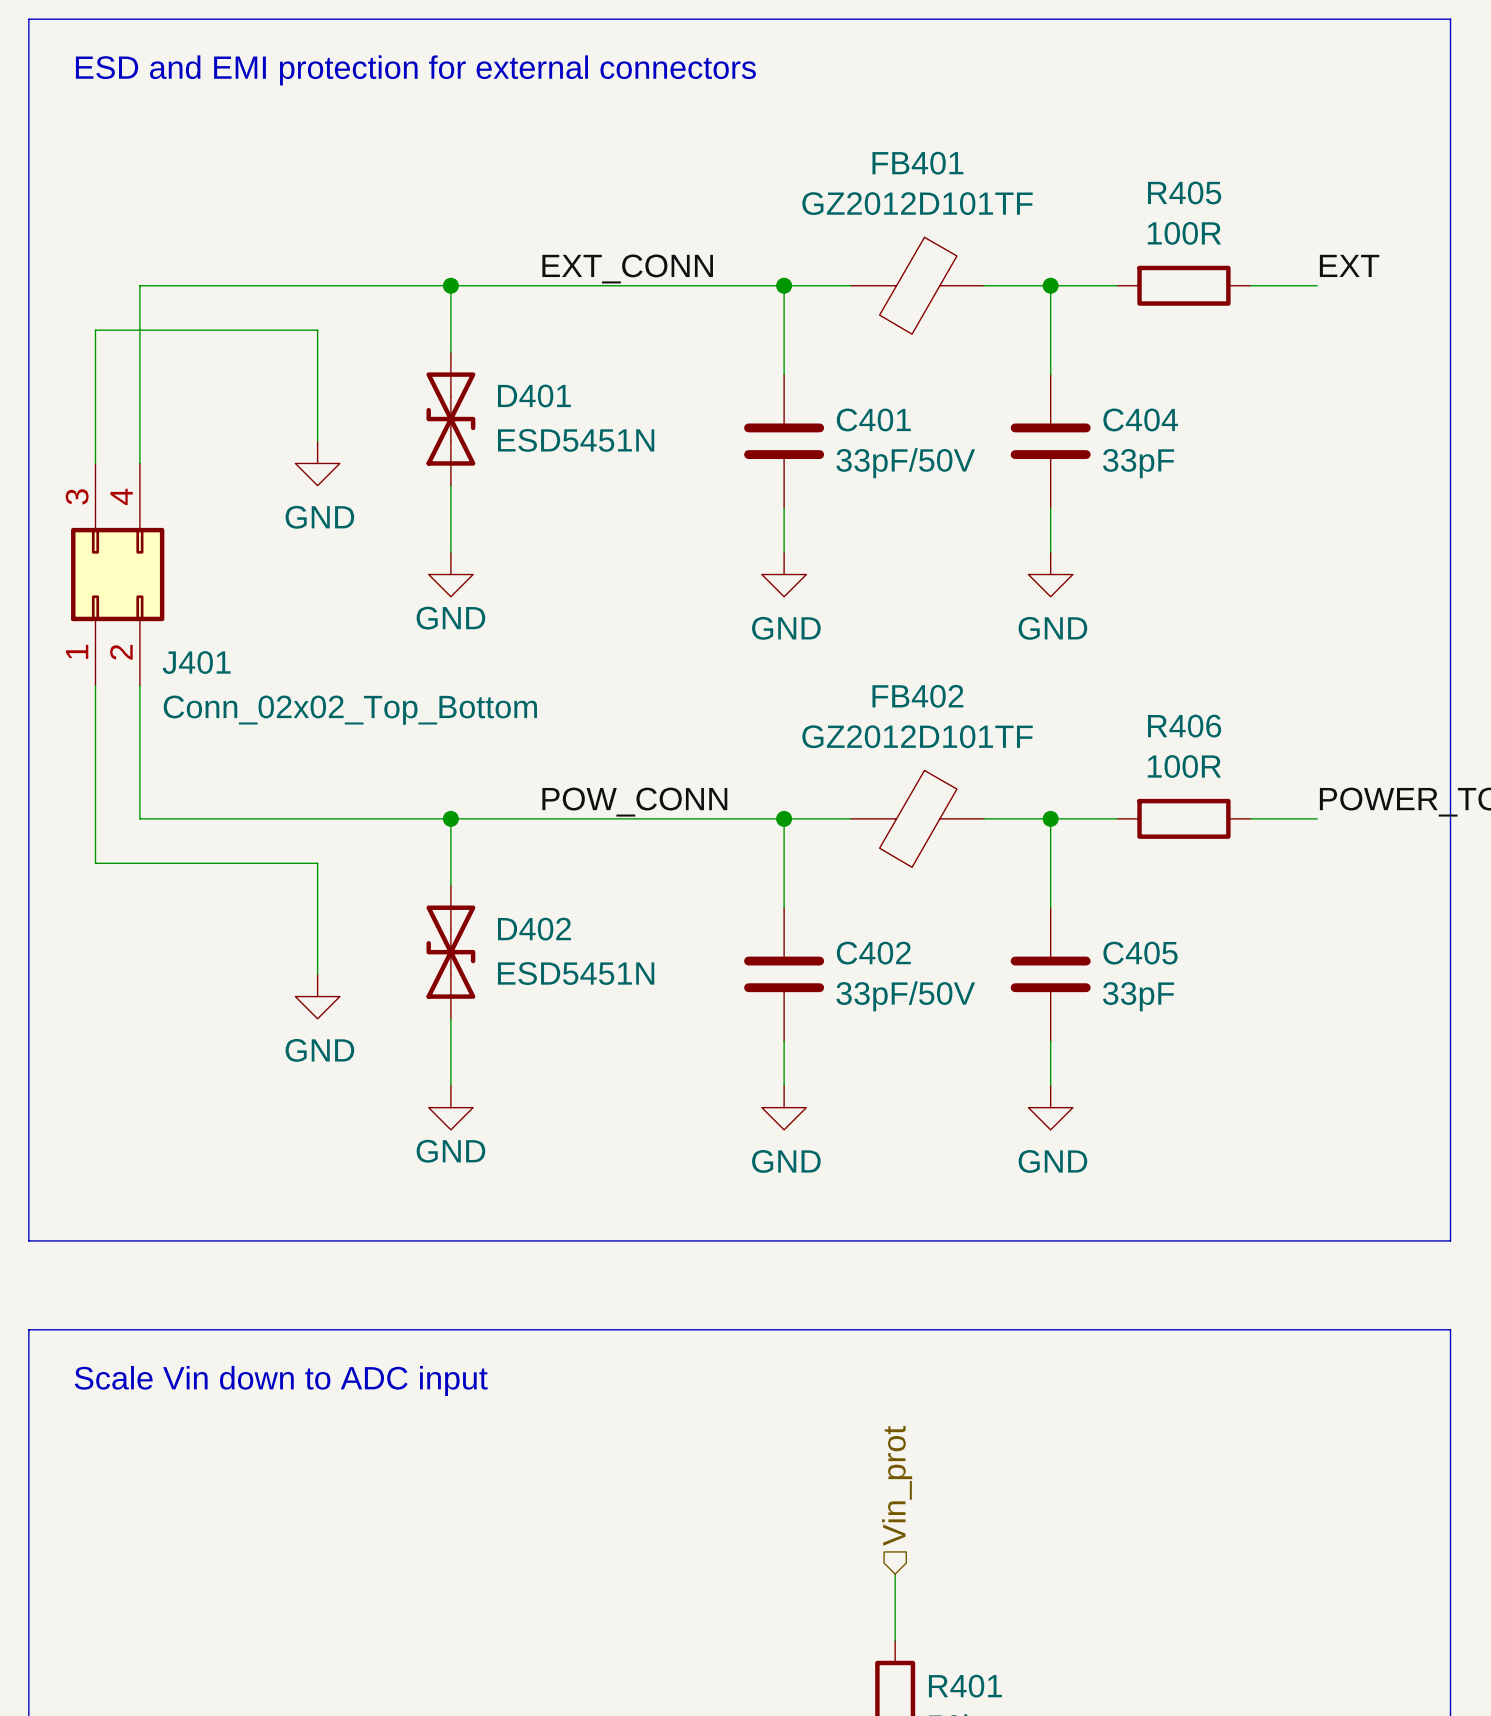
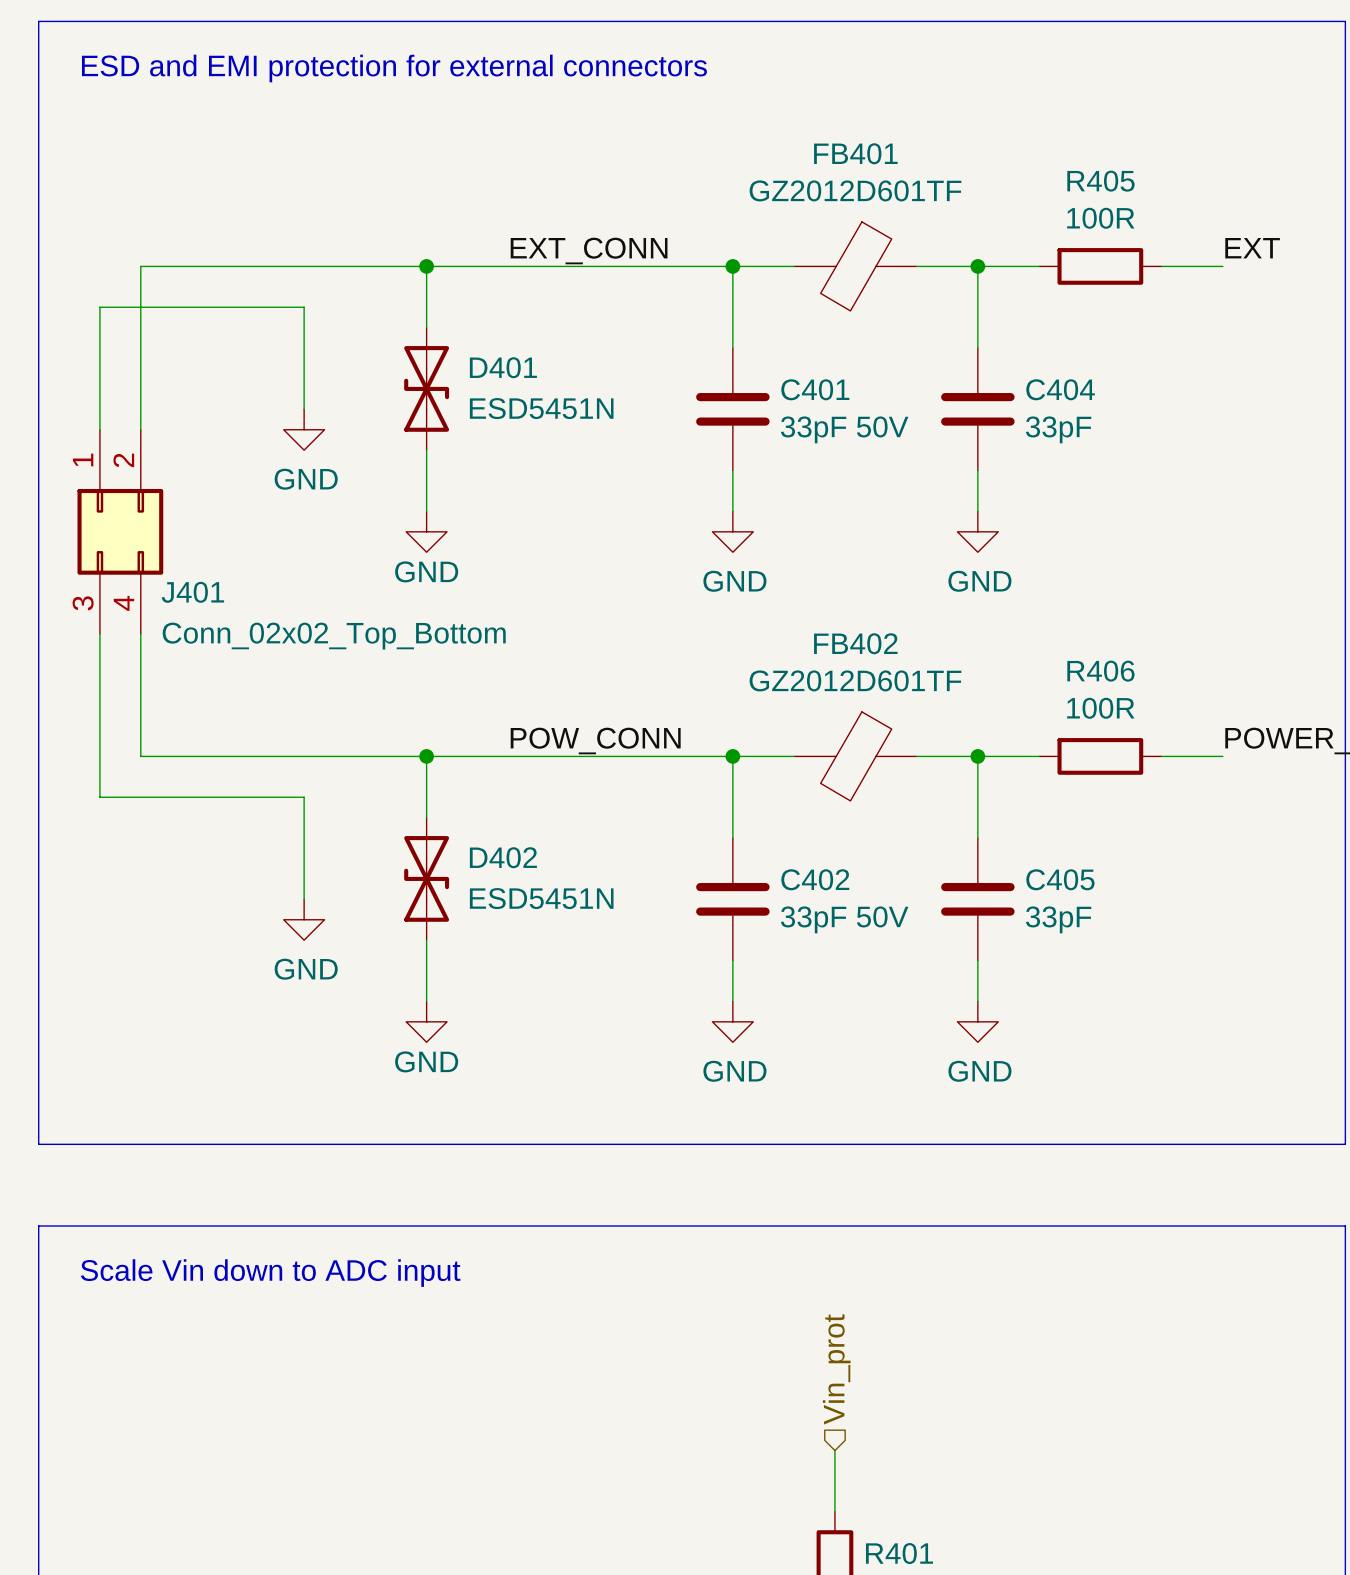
FB401 value: GZ2012D101TF (917, 203) -> GZ2012D601TF (855, 190)
C401 value: 33pF/50V (905, 463) -> 33pF 50V (844, 429)
J401 flip: as is (117, 574) -> up-down (120, 531)
FB402 value: GZ2012D101TF (917, 736) -> GZ2012D601TF (855, 680)
C402 value: 33pF/50V (905, 996) -> 33pF 50V (844, 919)

